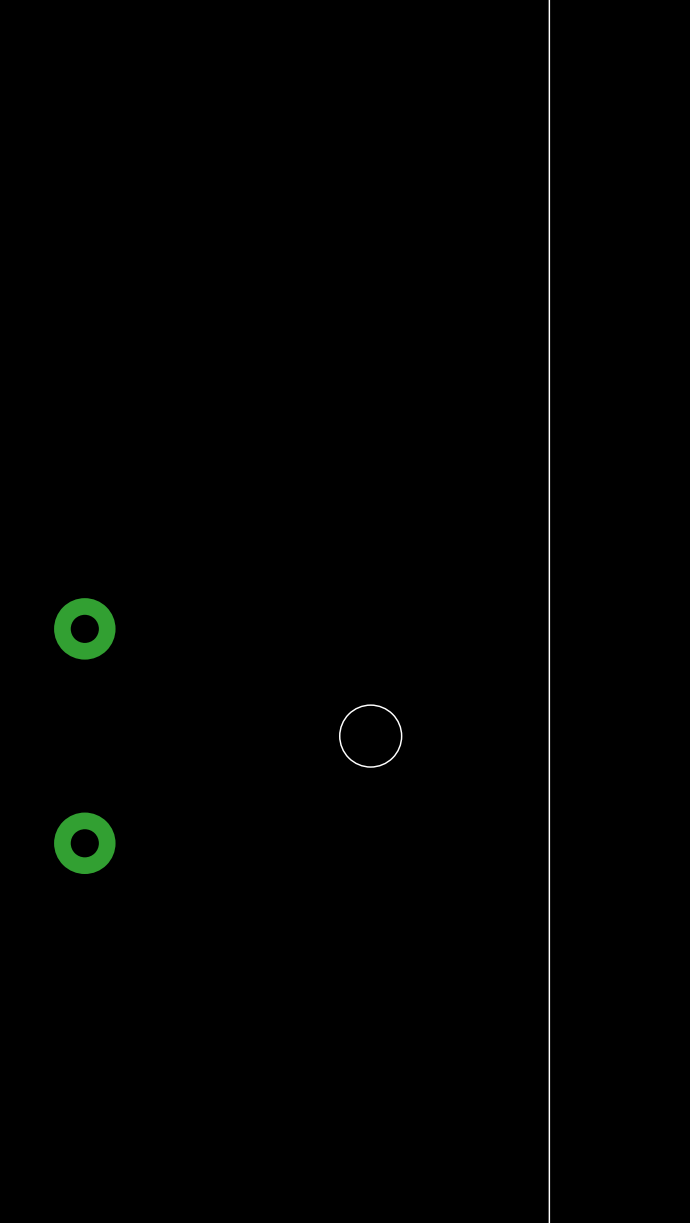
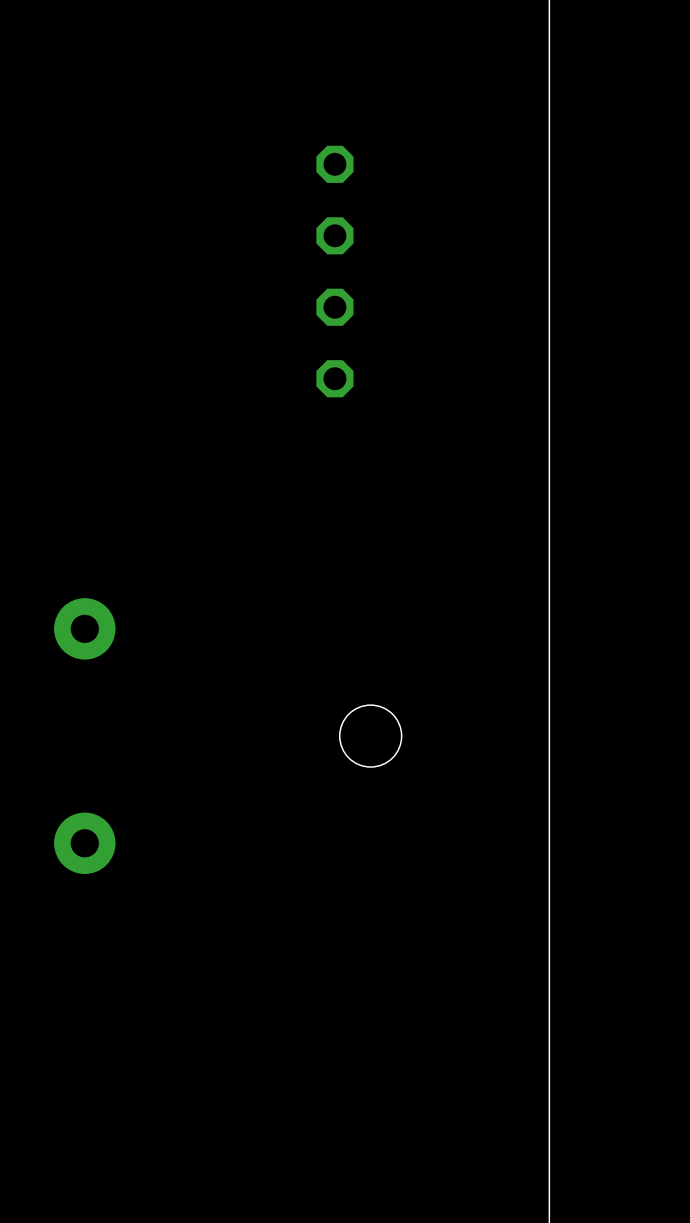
part: none -> (334, 200)
part: none -> (334, 342)

